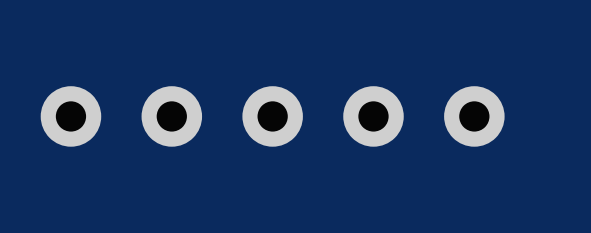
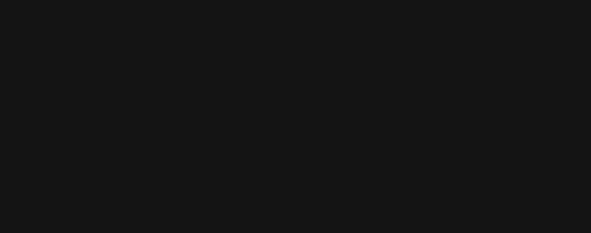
part: (272, 116) -> none

